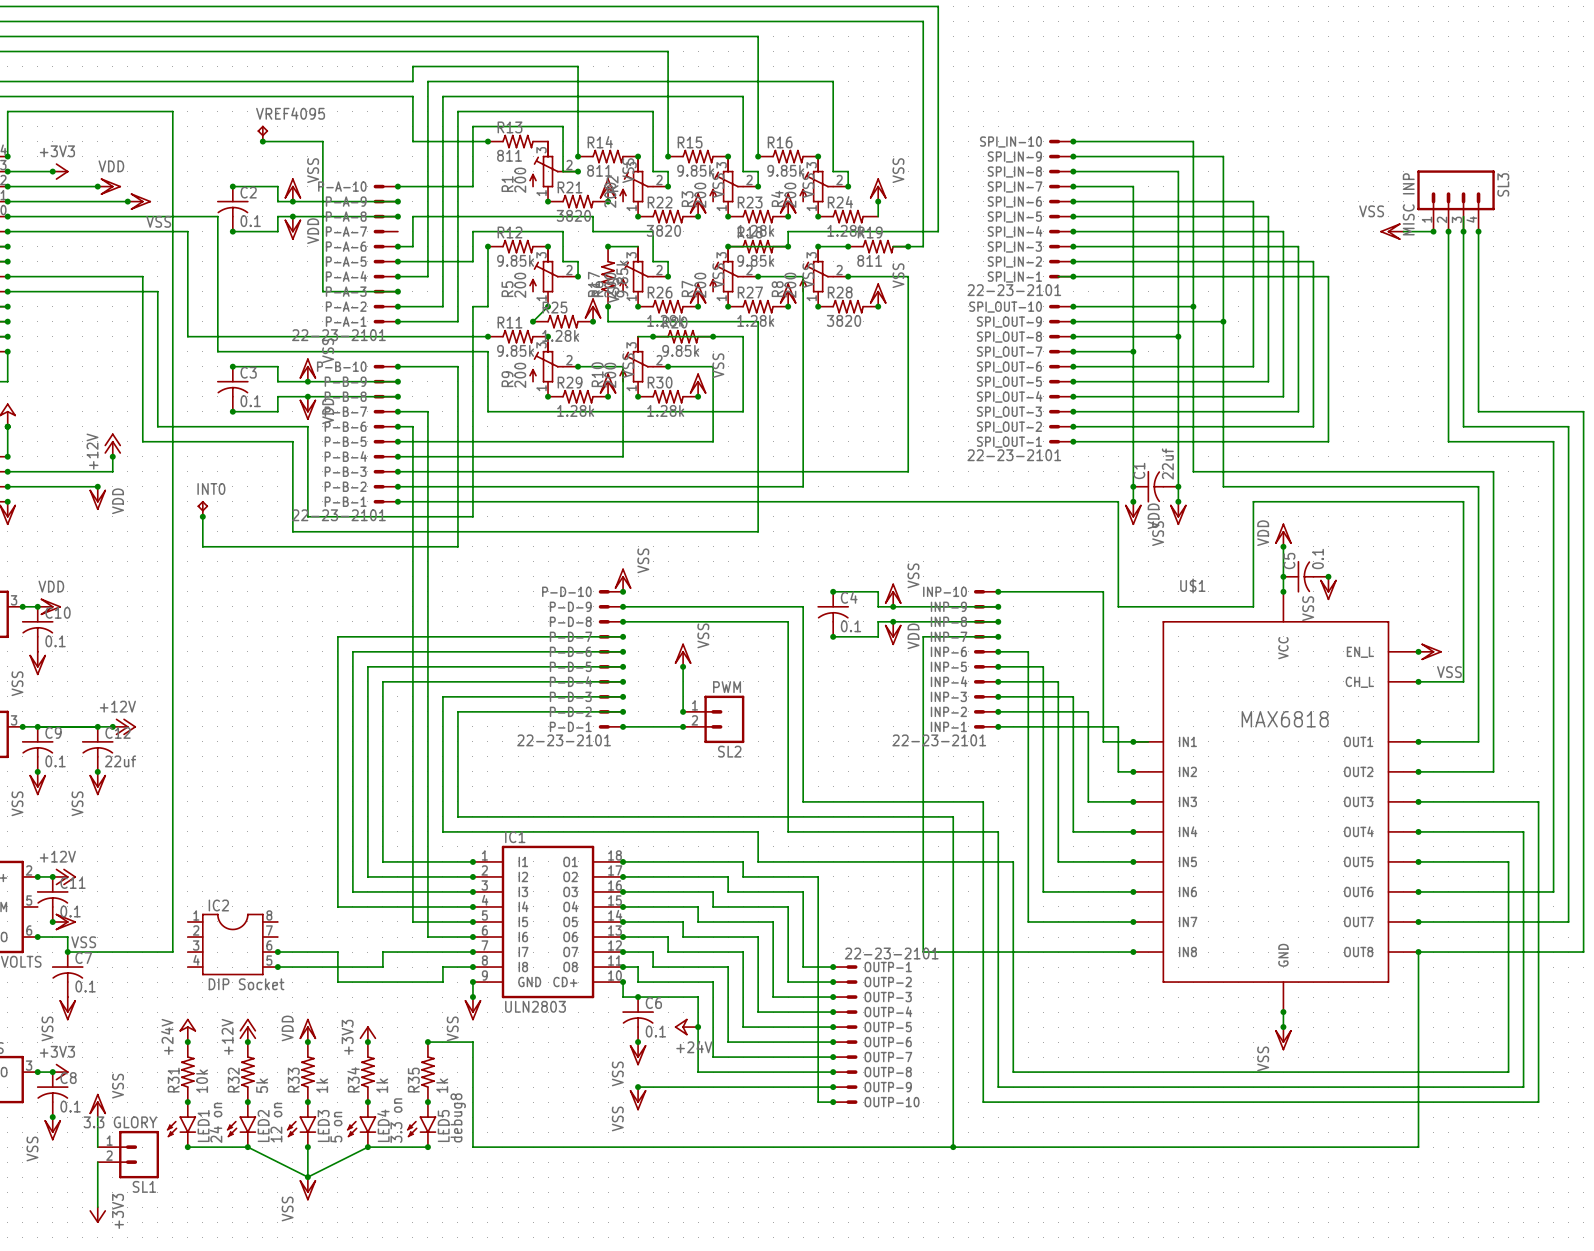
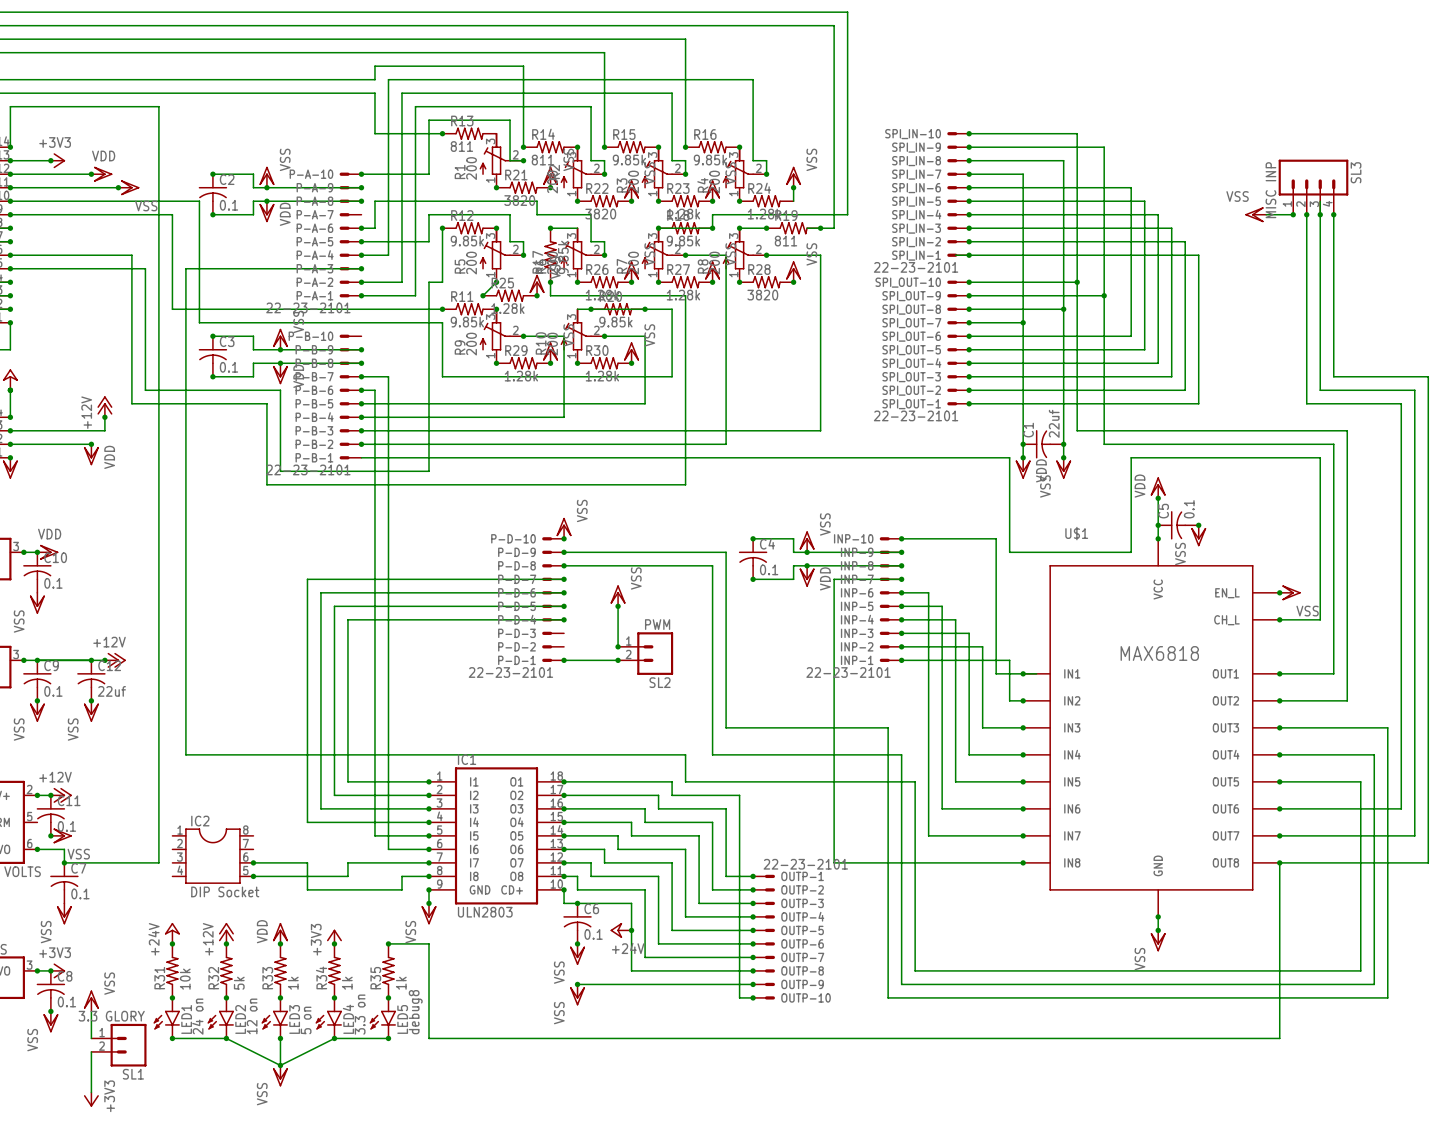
VREF4095: (262, 133) -> none
wire: (262, 141) (322, 141) (322, 291) -> (185, 471) (185, 268) (293, 268)
junction: (262, 141) -> none
wire: (397, 366) (457, 366) (457, 546) (202, 546) -> none
junction: (397, 366) -> none
junction: (397, 501) -> none
INT0: (202, 508) -> none
junction: (202, 516) -> none
wire: (623, 696) (442, 696) (442, 831) -> (185, 498) (185, 754) (401, 754)
junction: (623, 696) -> none
wire: (623, 711) (457, 711) (457, 816) (953, 816) (953, 1147) -> none
junction: (623, 711) -> none
junction: (953, 1147) -> none

